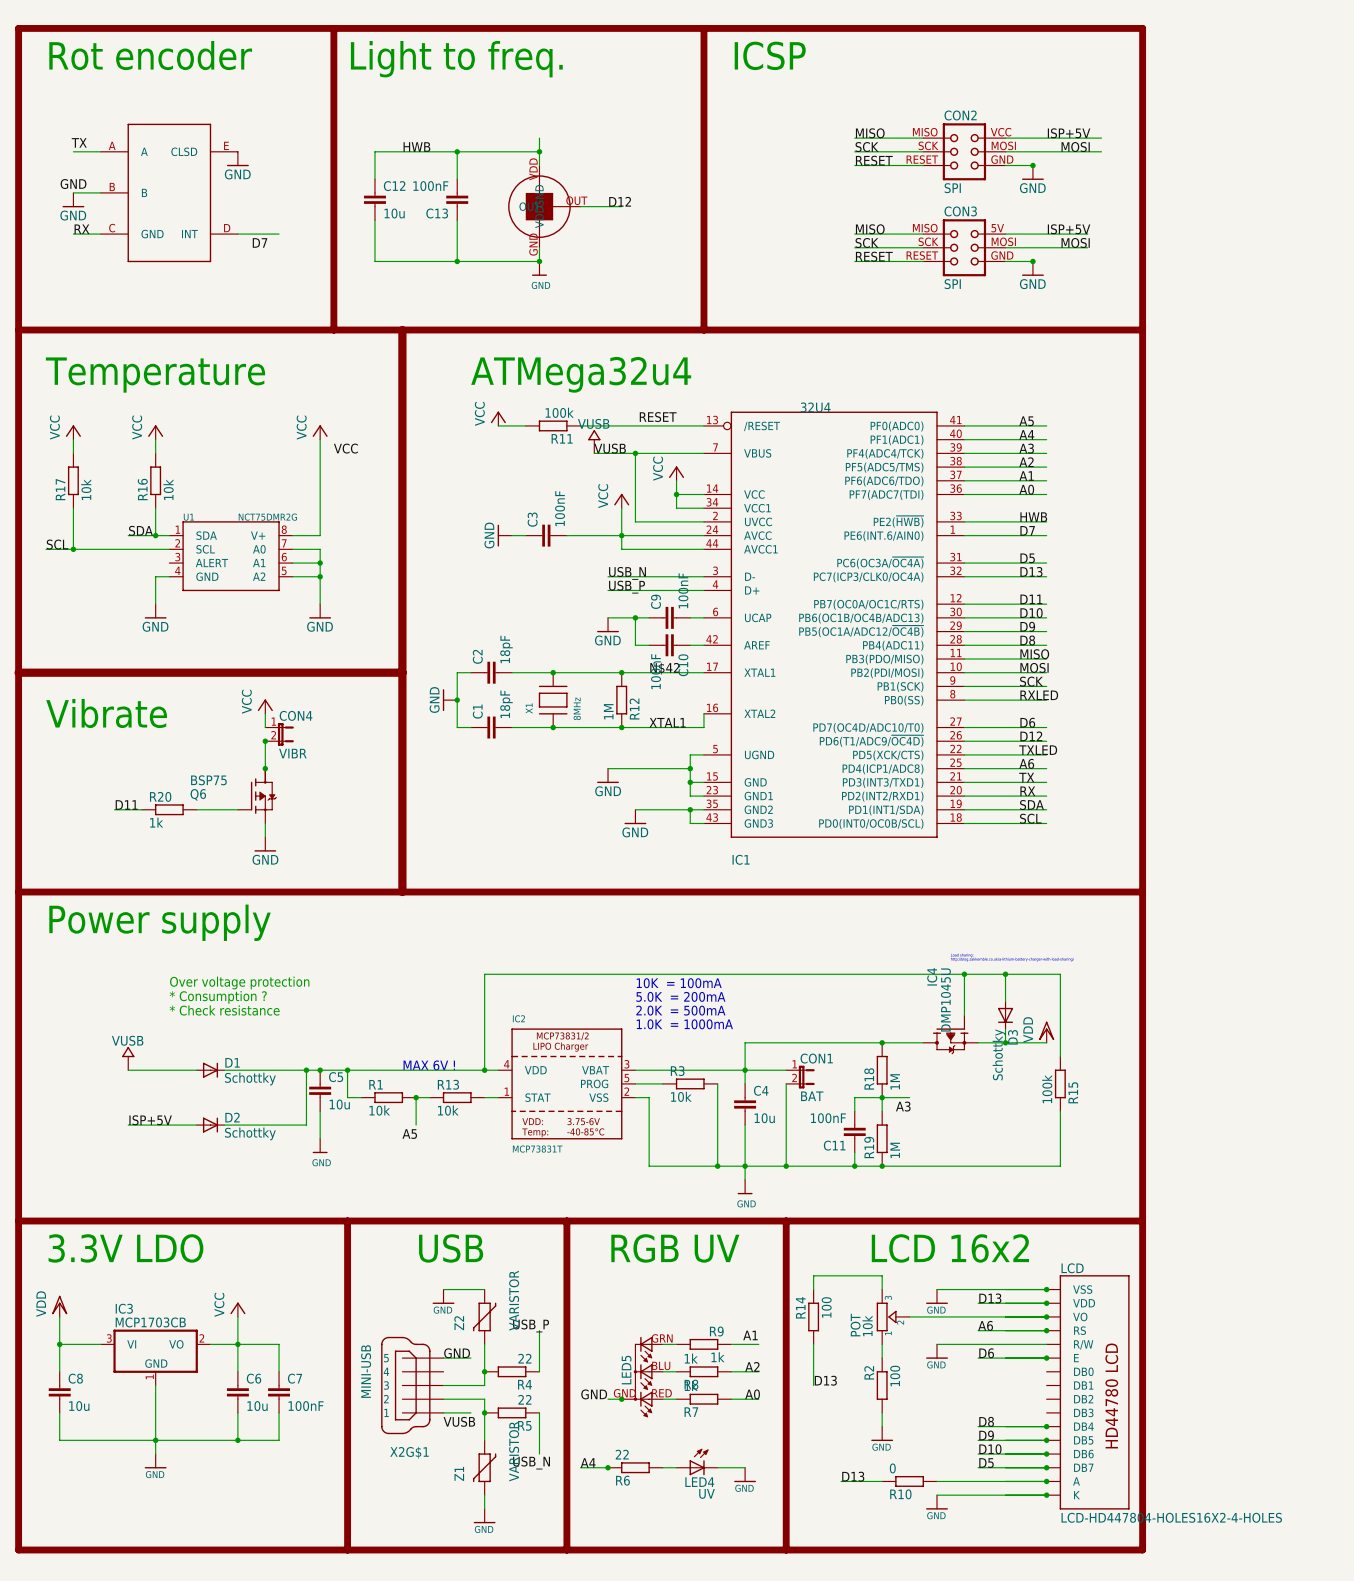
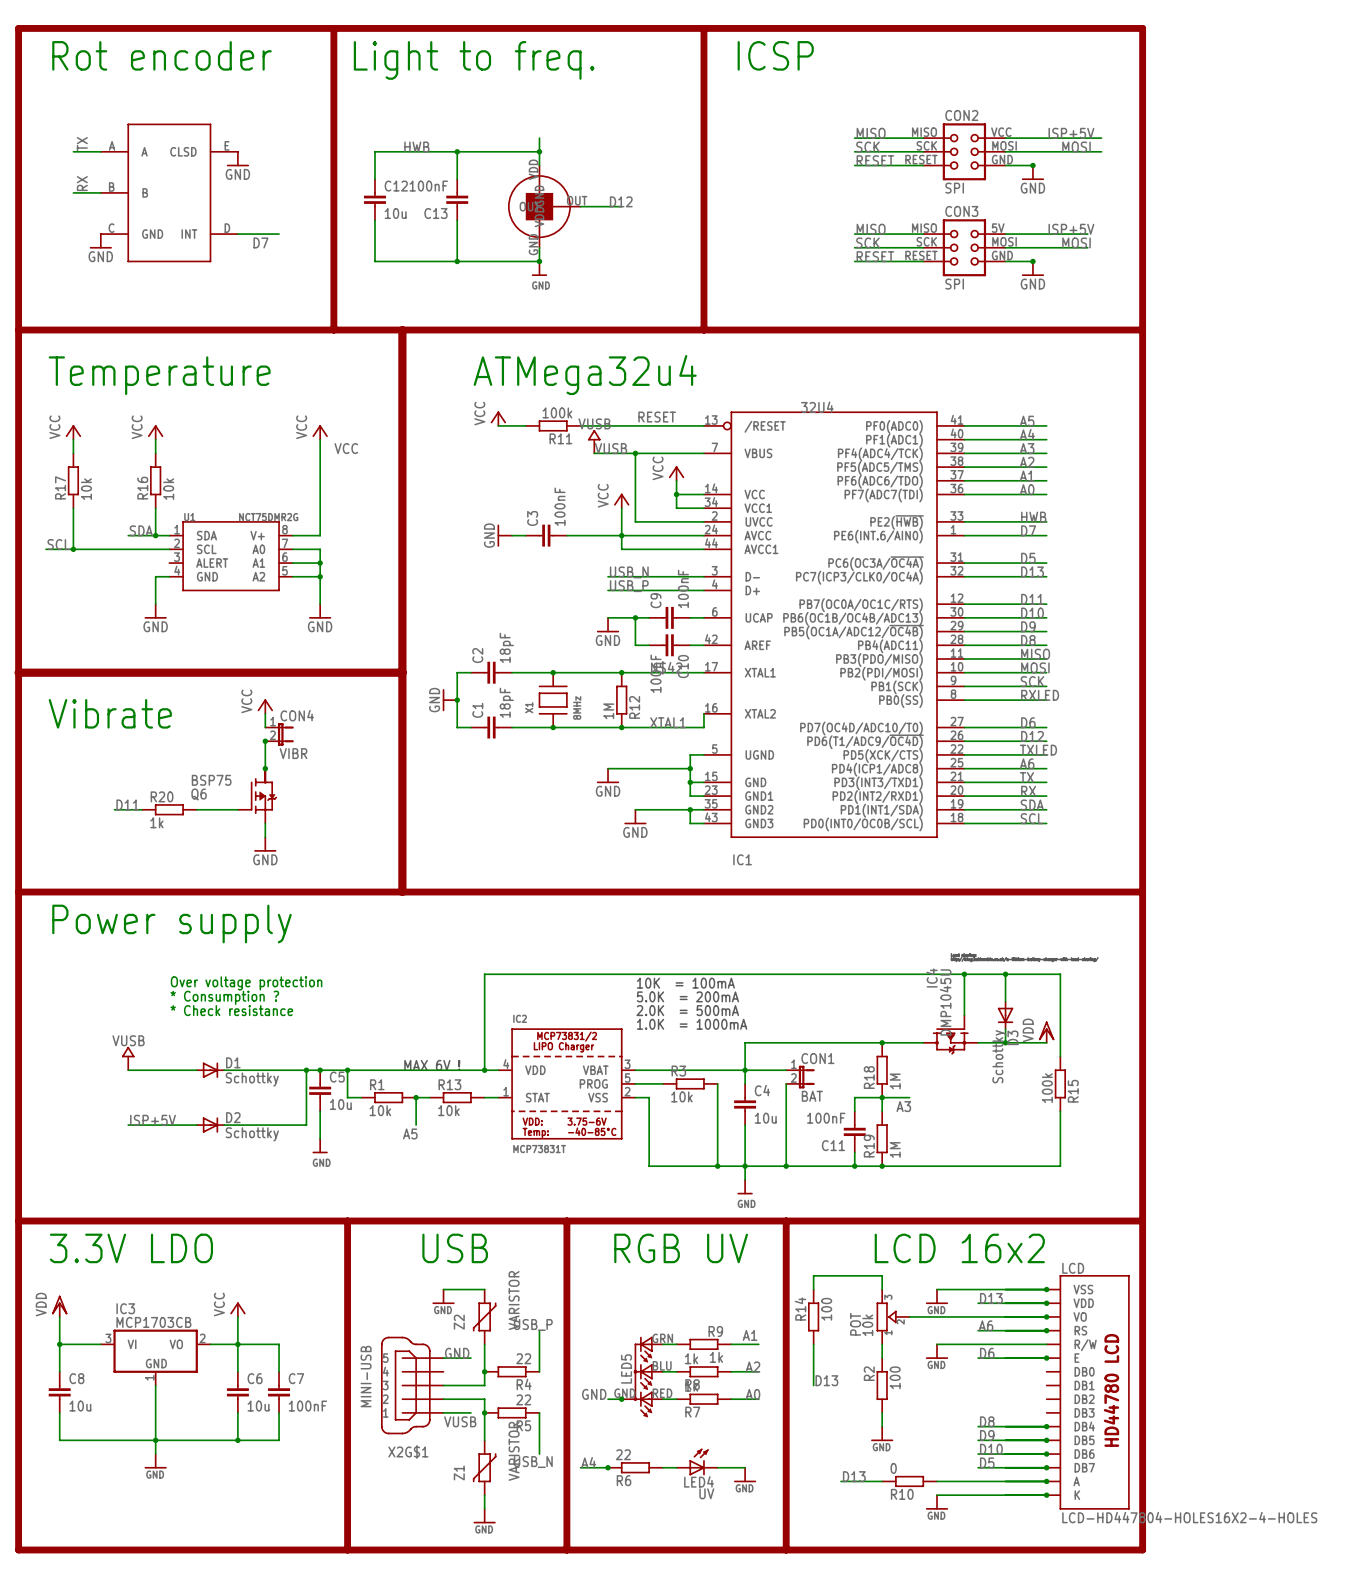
label rotation: 0° (79, 142) -> 90° counterclockwise (82, 144)
label: GND (73, 184) -> none
power symbol position: GND (73, 200) -> GND (100, 241)
label rotation: 0° (81, 229) -> 90° counterclockwise (82, 183)
label position: RX (81, 229) -> RX (82, 183)
wire: (73, 234) (100, 234) -> none

